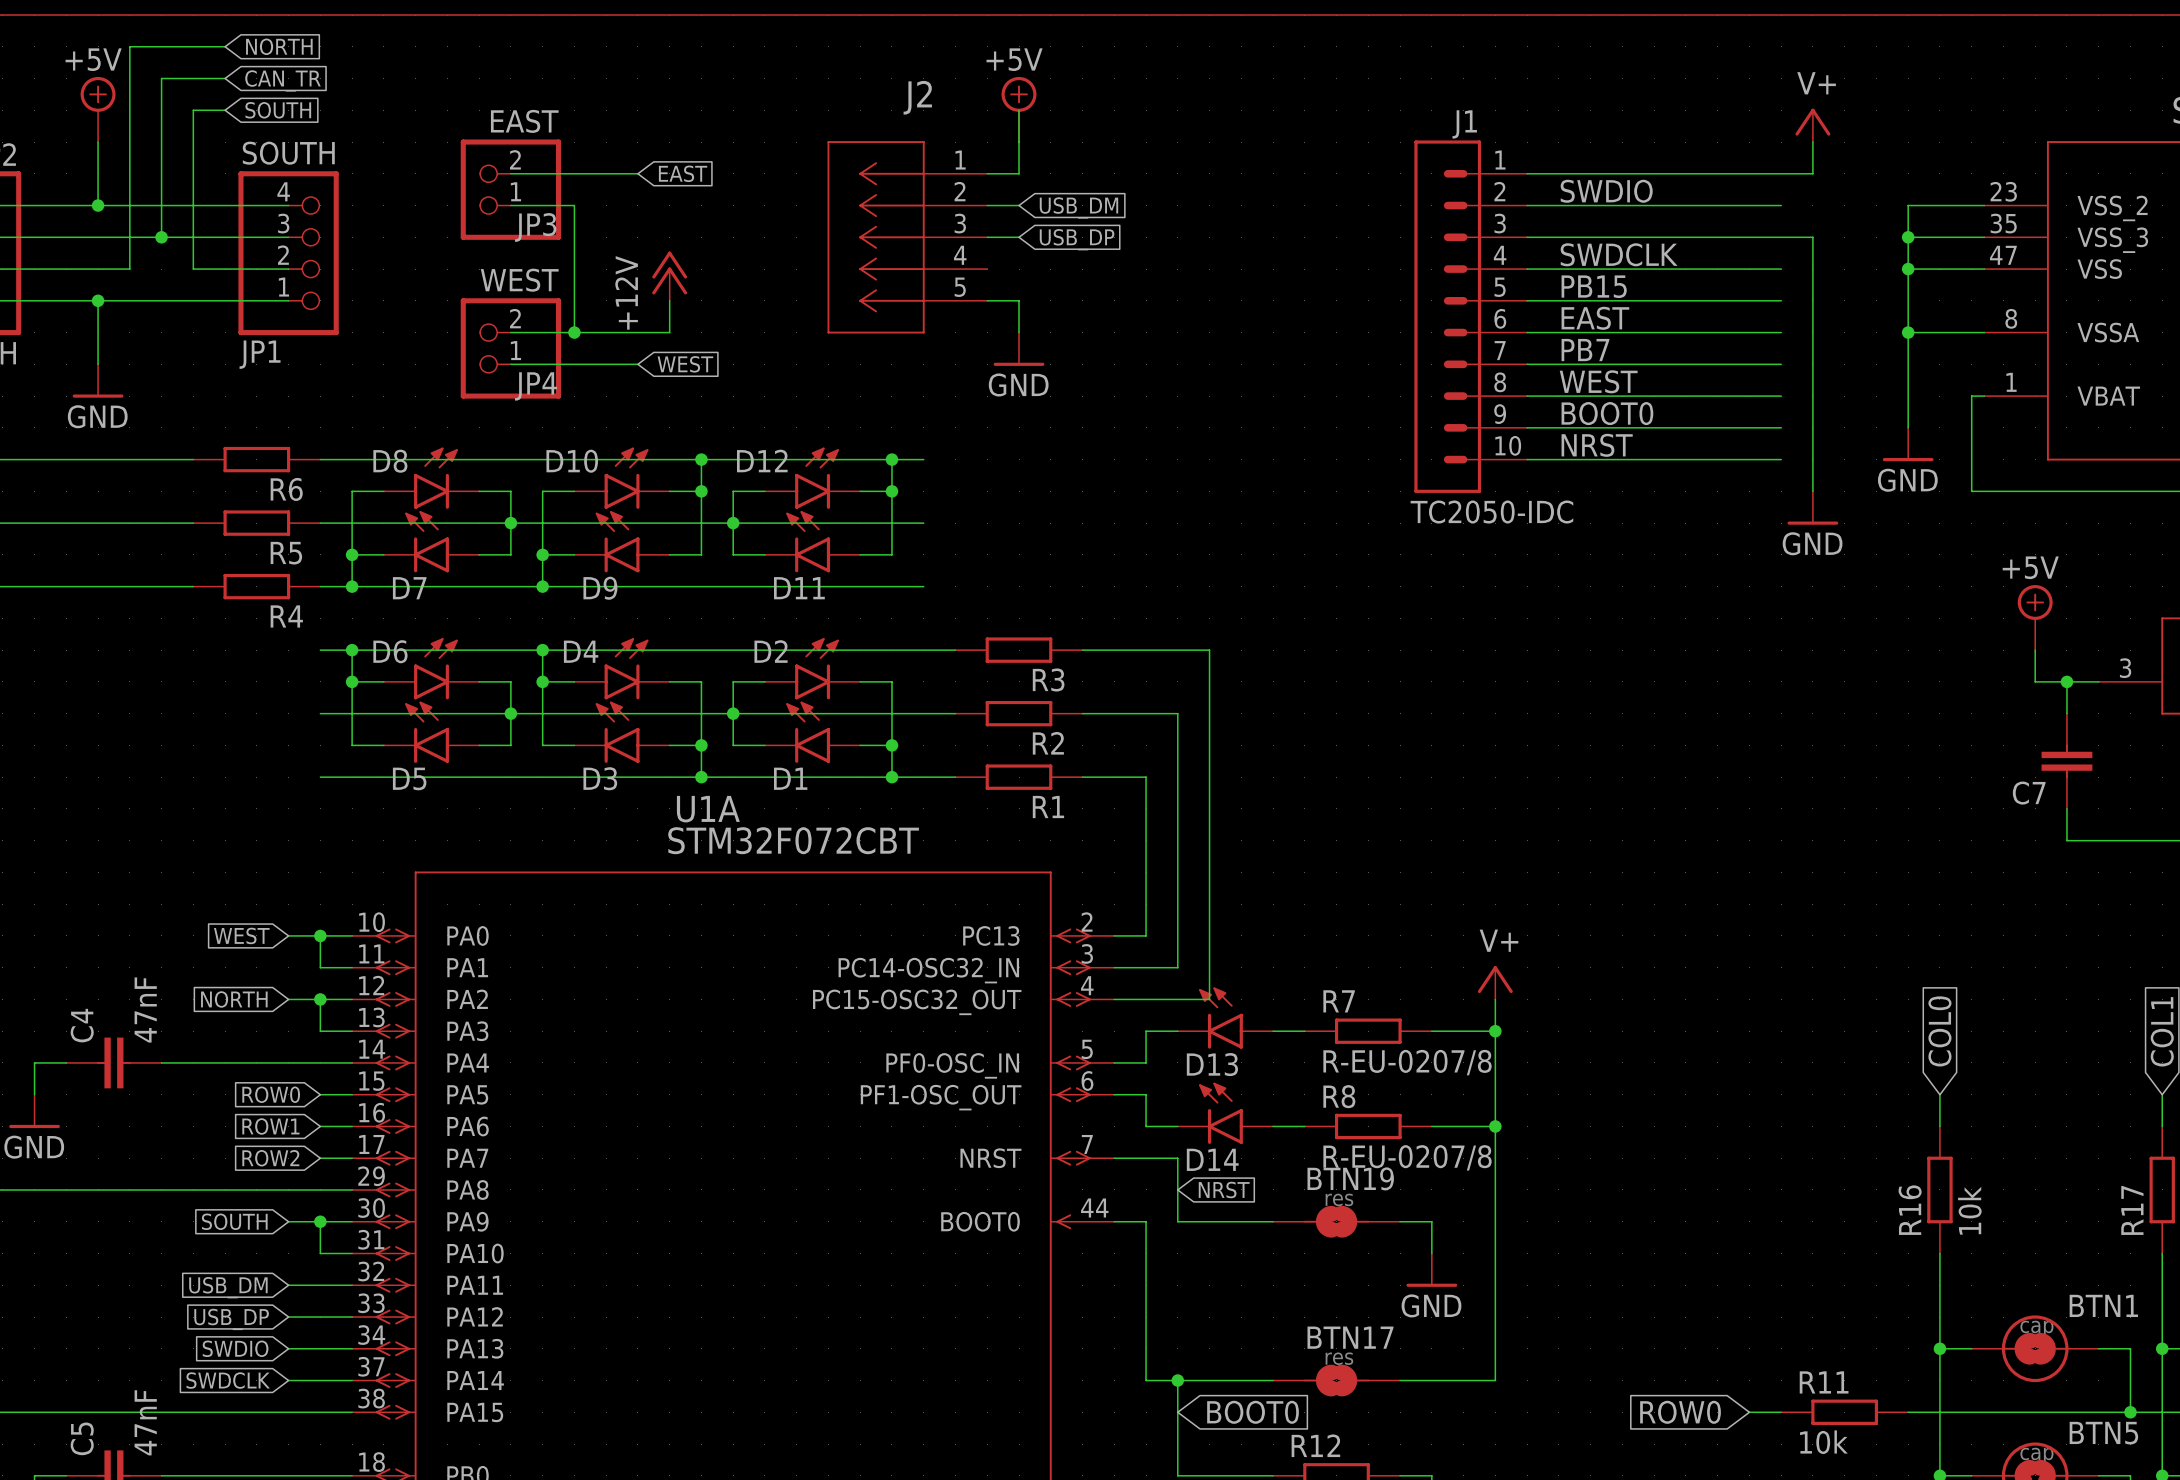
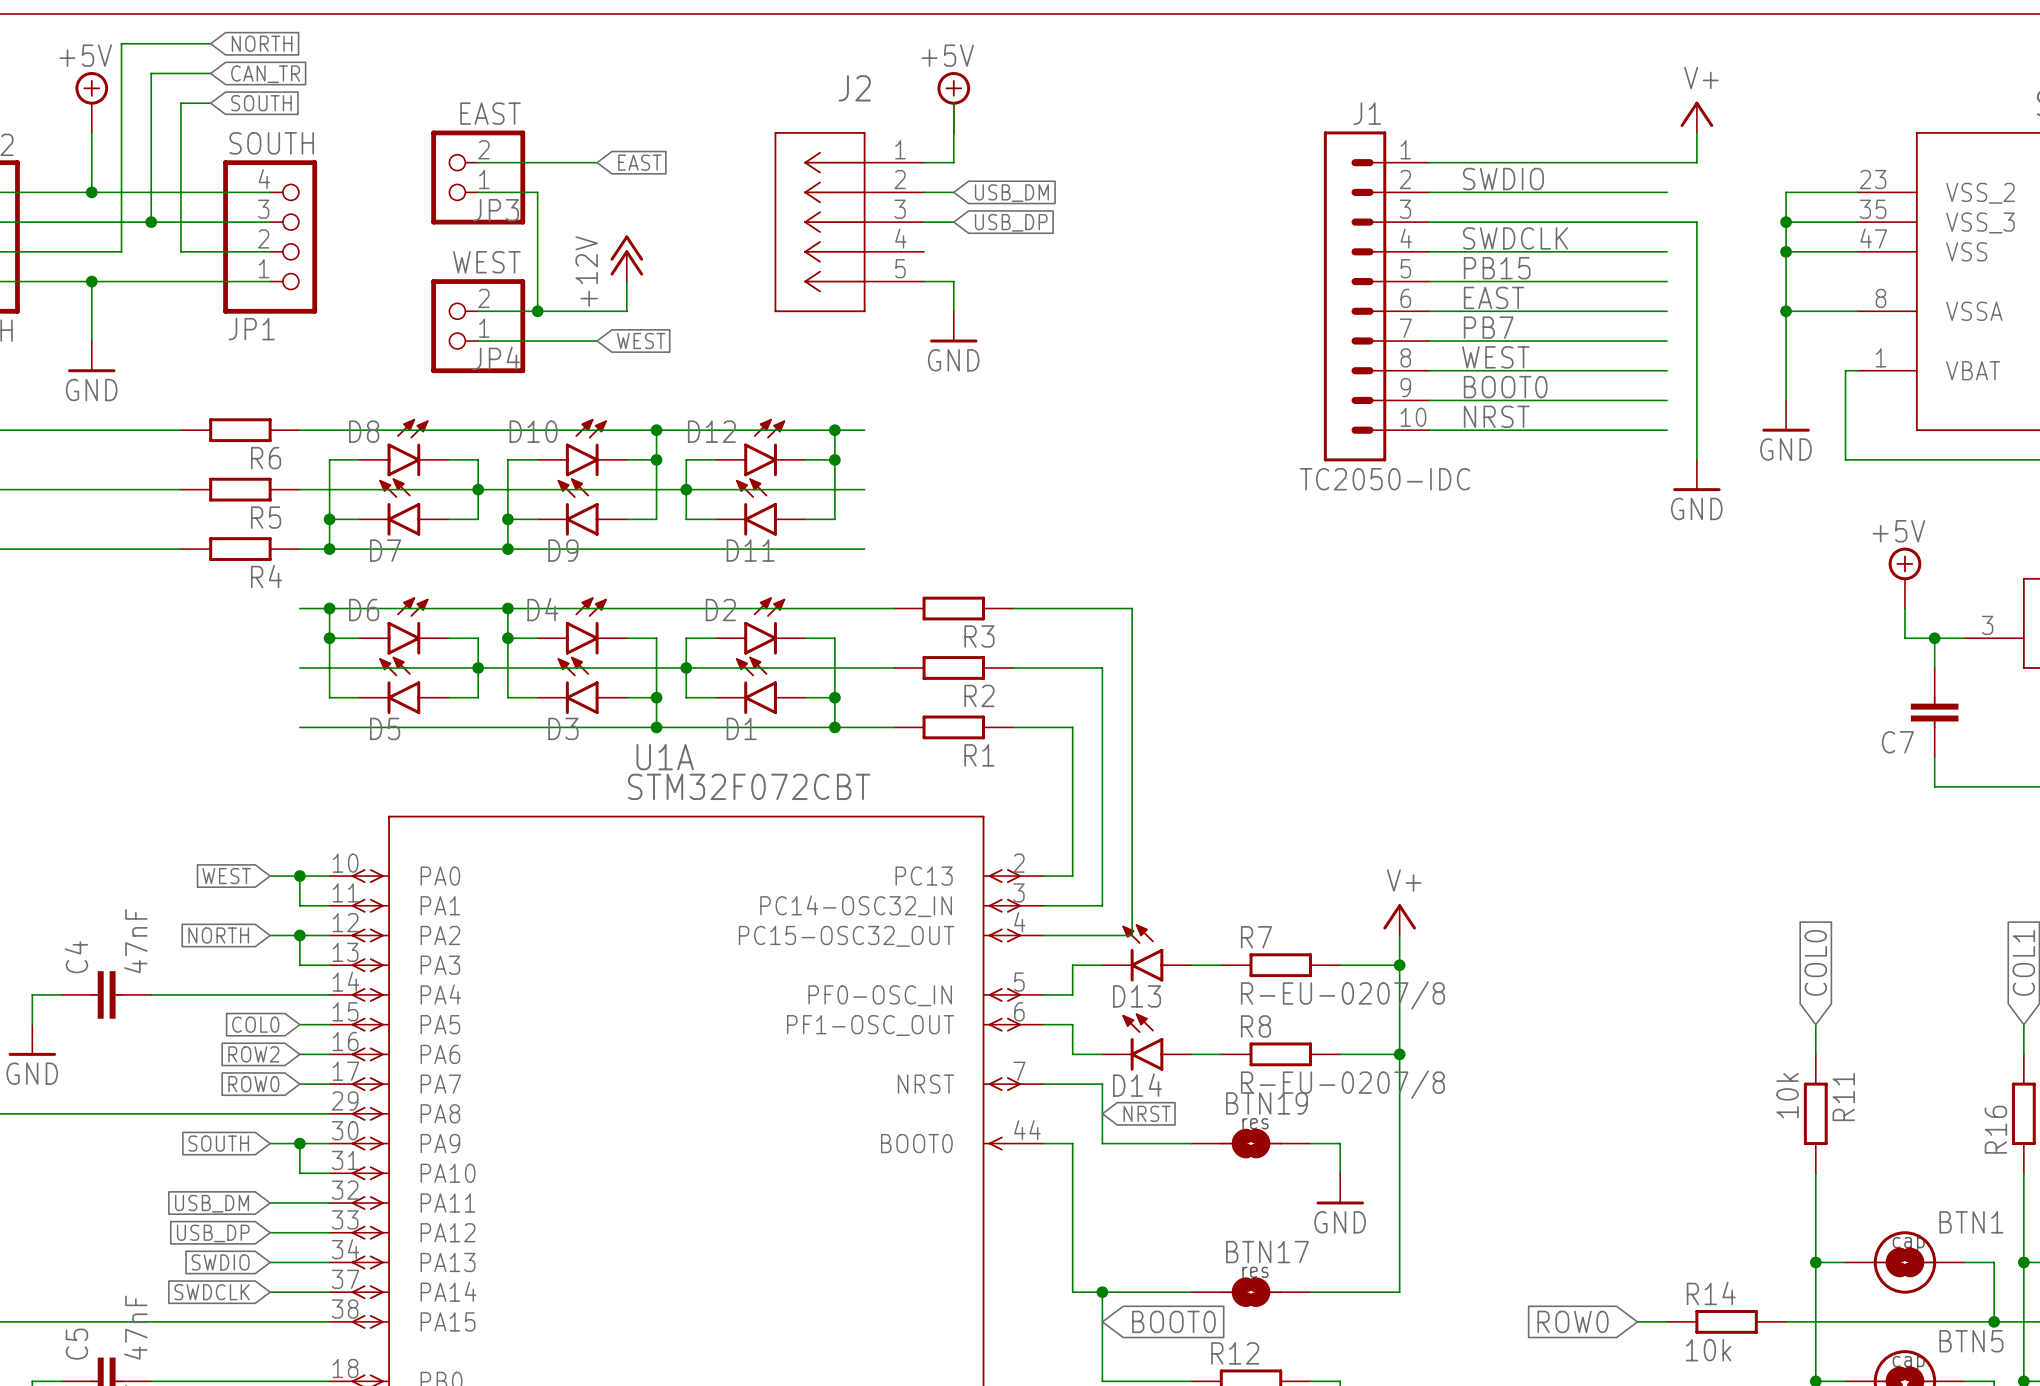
global label: ROW0 (271, 1094) -> COL0 (255, 1024)
global label: ROW1 (270, 1126) -> ROW2 (253, 1054)
global label: ROW2 (270, 1158) -> ROW0 (253, 1084)
R16 name: R16 (1910, 1210) -> R11 (1843, 1097)
R16 value position: 10k (1969, 1210) -> 10k (1787, 1095)
R17 name: R17 (2132, 1210) -> R16 (1995, 1129)
R11 name: R11 (1824, 1382) -> R14 (1711, 1293)

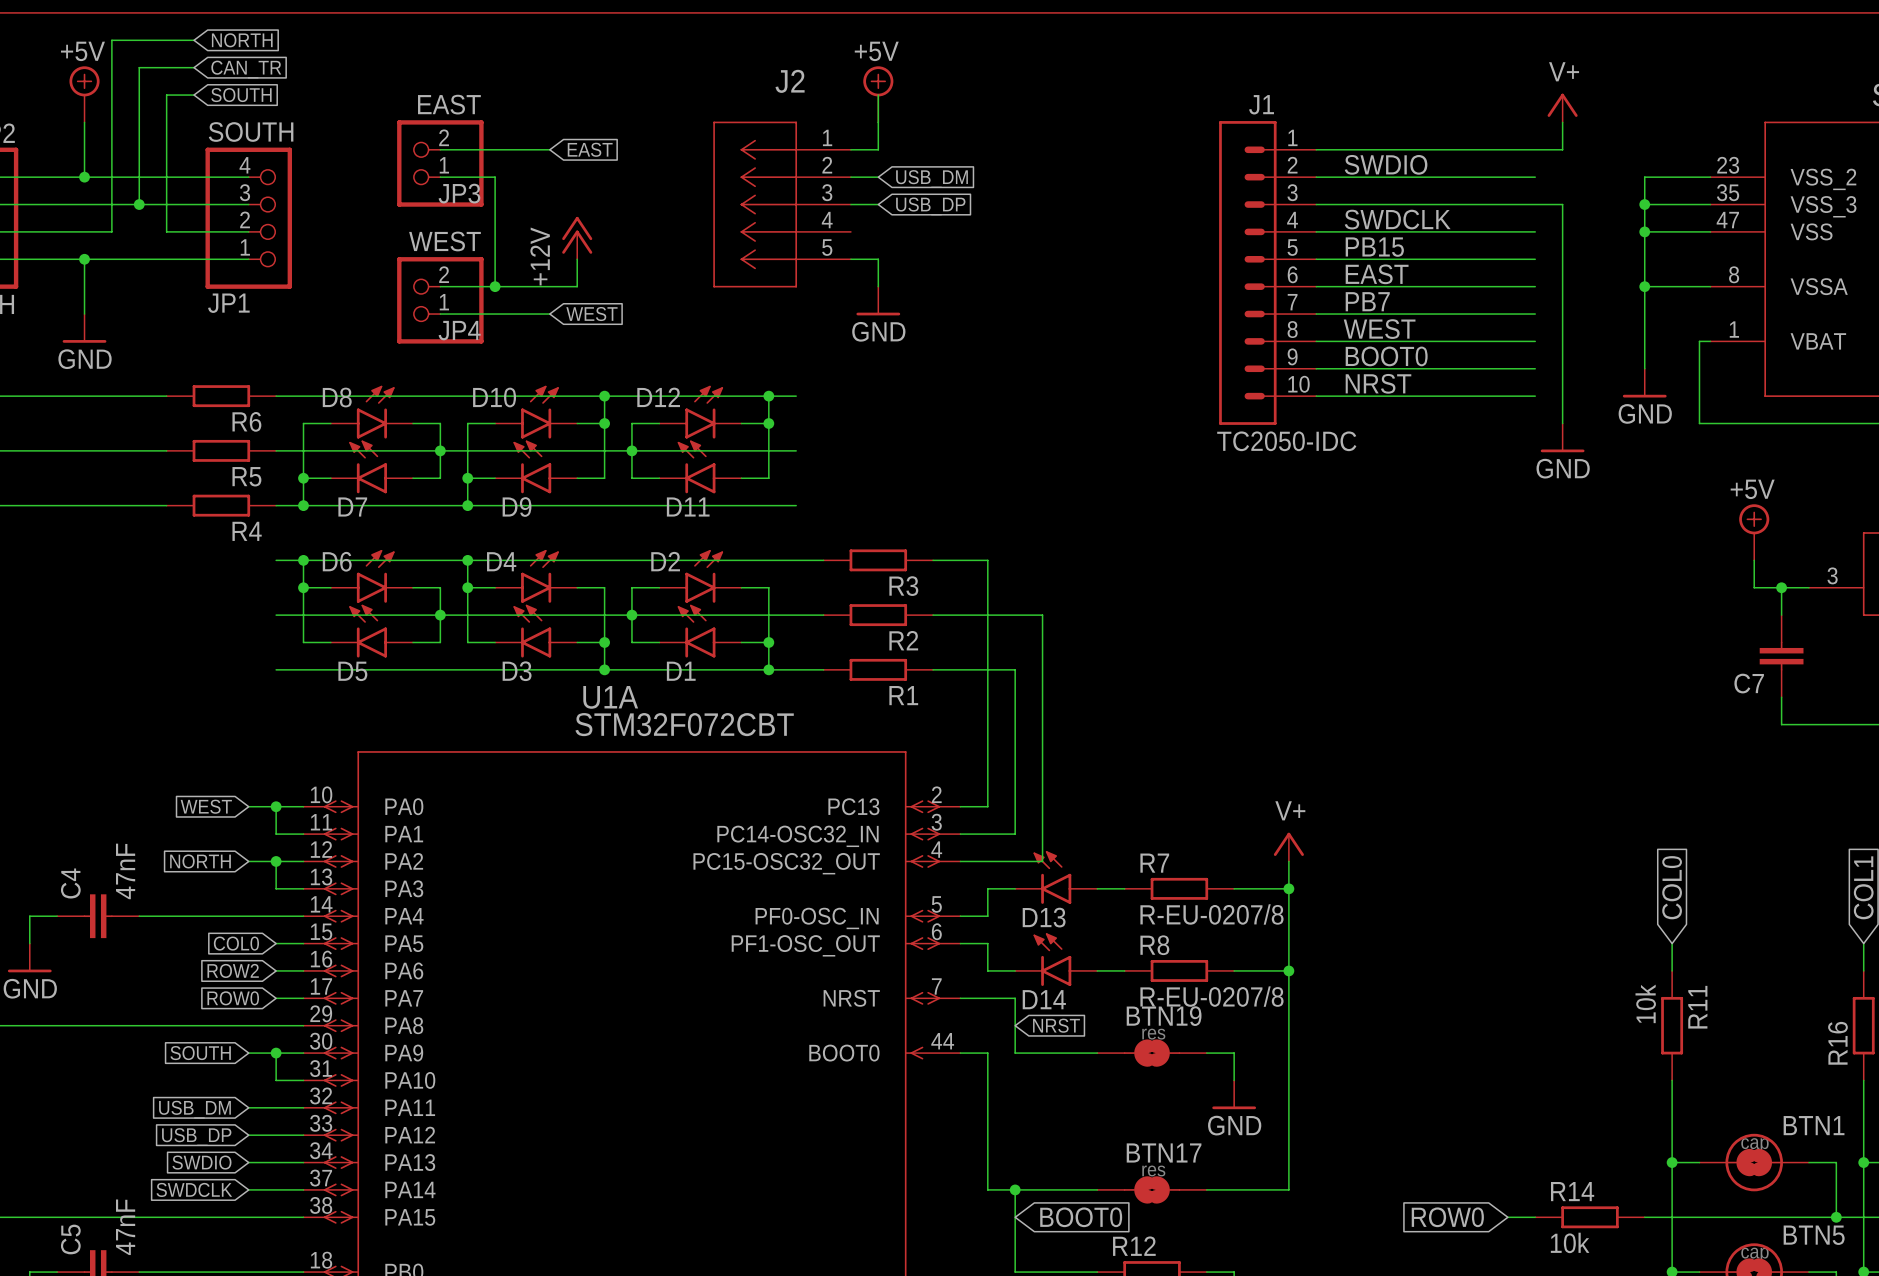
wire: (1072, 608) (1132, 608) (1132, 667) -> (987, 560) (987, 669) (1015, 669)
wire: (1102, 667) (1102, 727) -> (1015, 615) (1042, 615)

